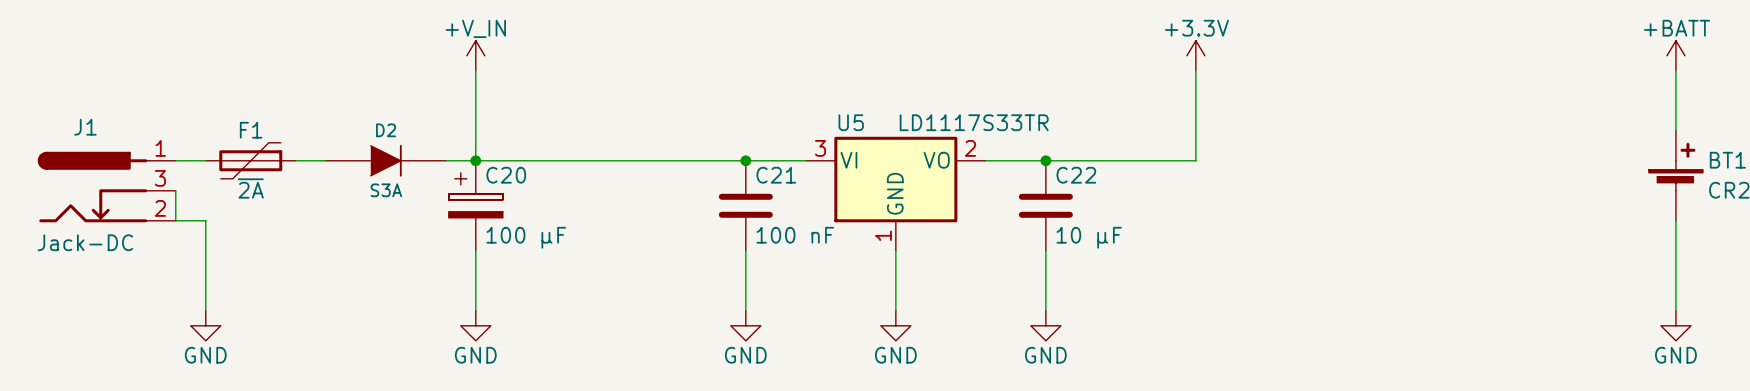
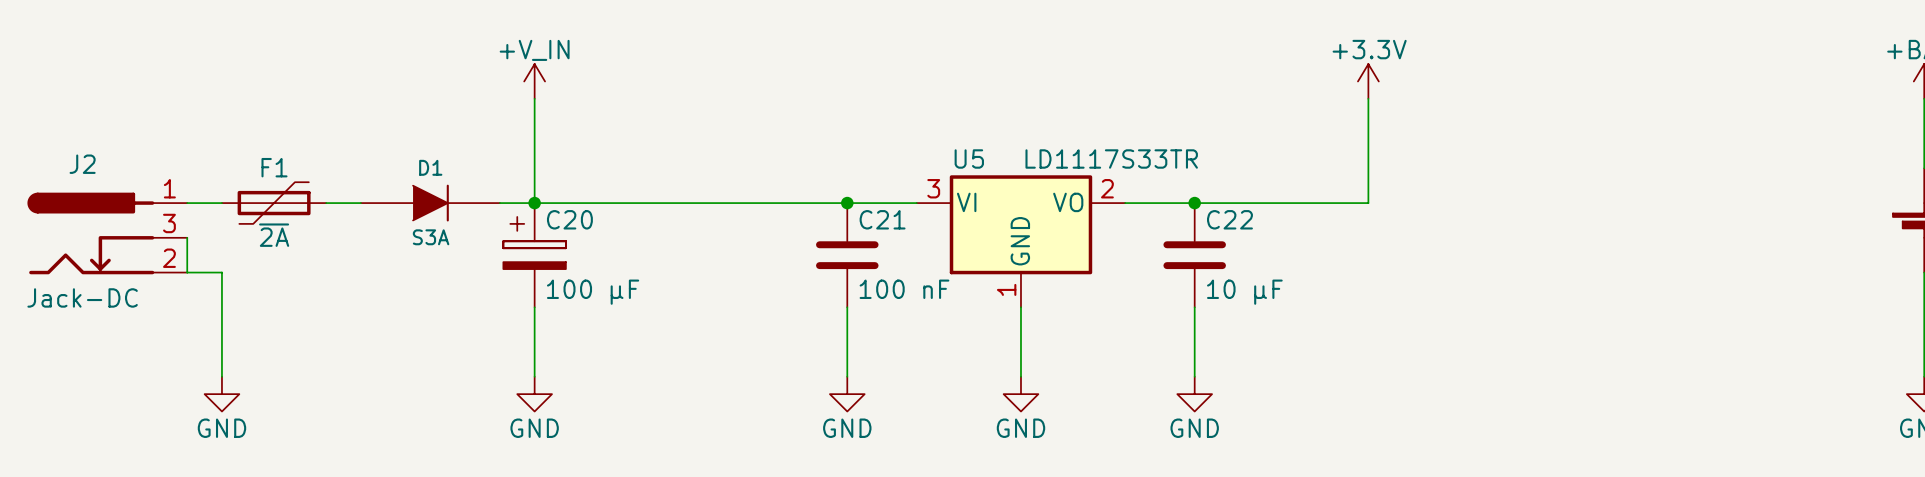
J1 name: J1 (85, 127) -> J2 (82, 164)
D2 name: D2 (386, 130) -> D1 (430, 167)

